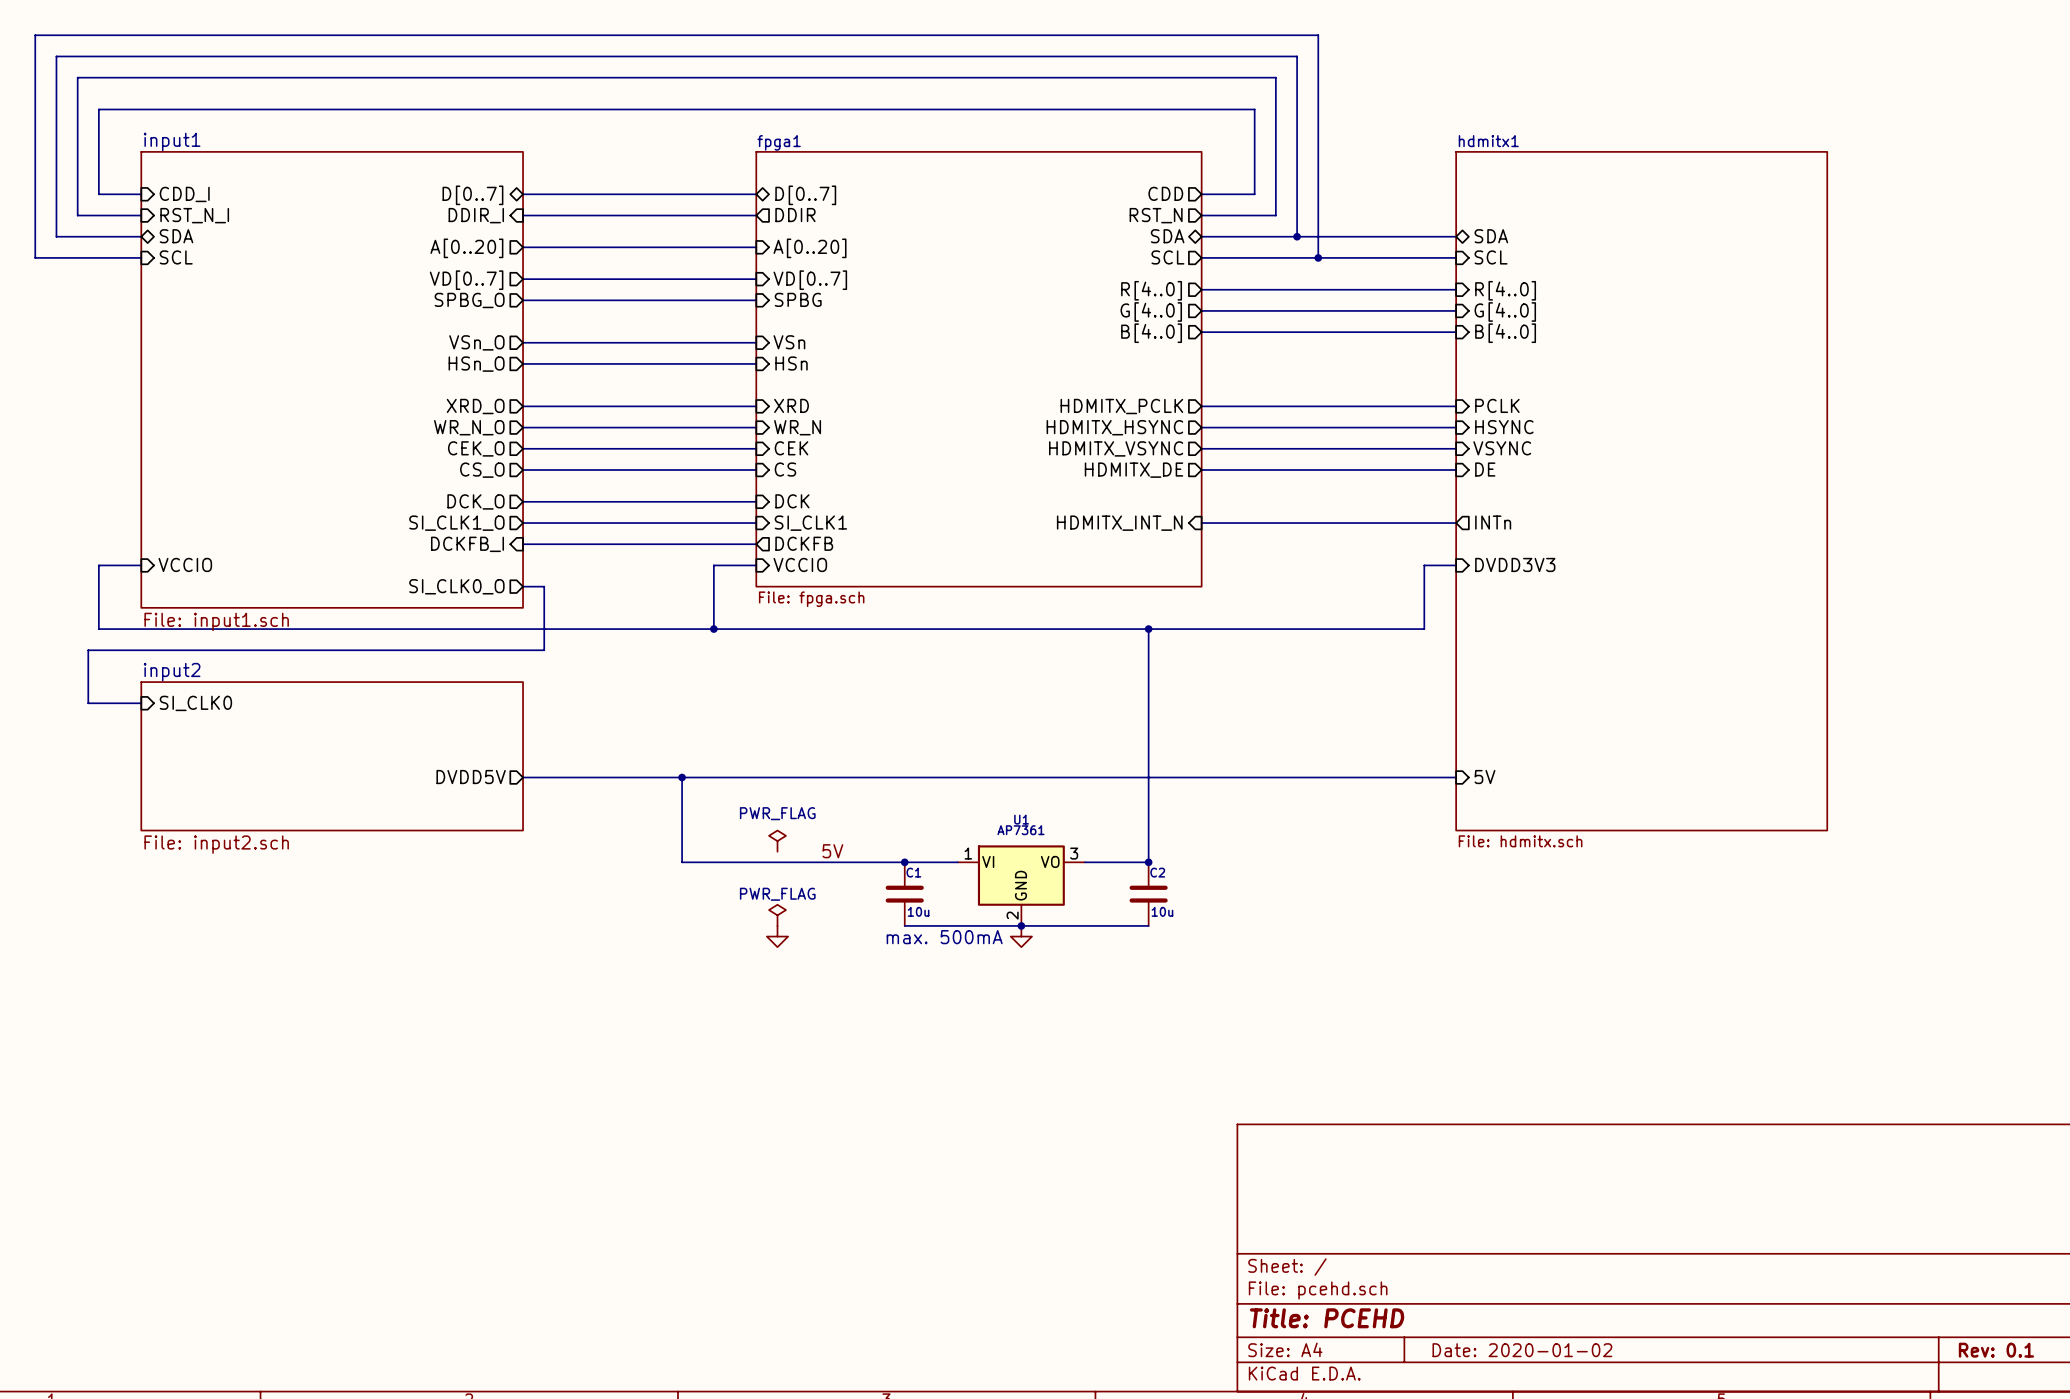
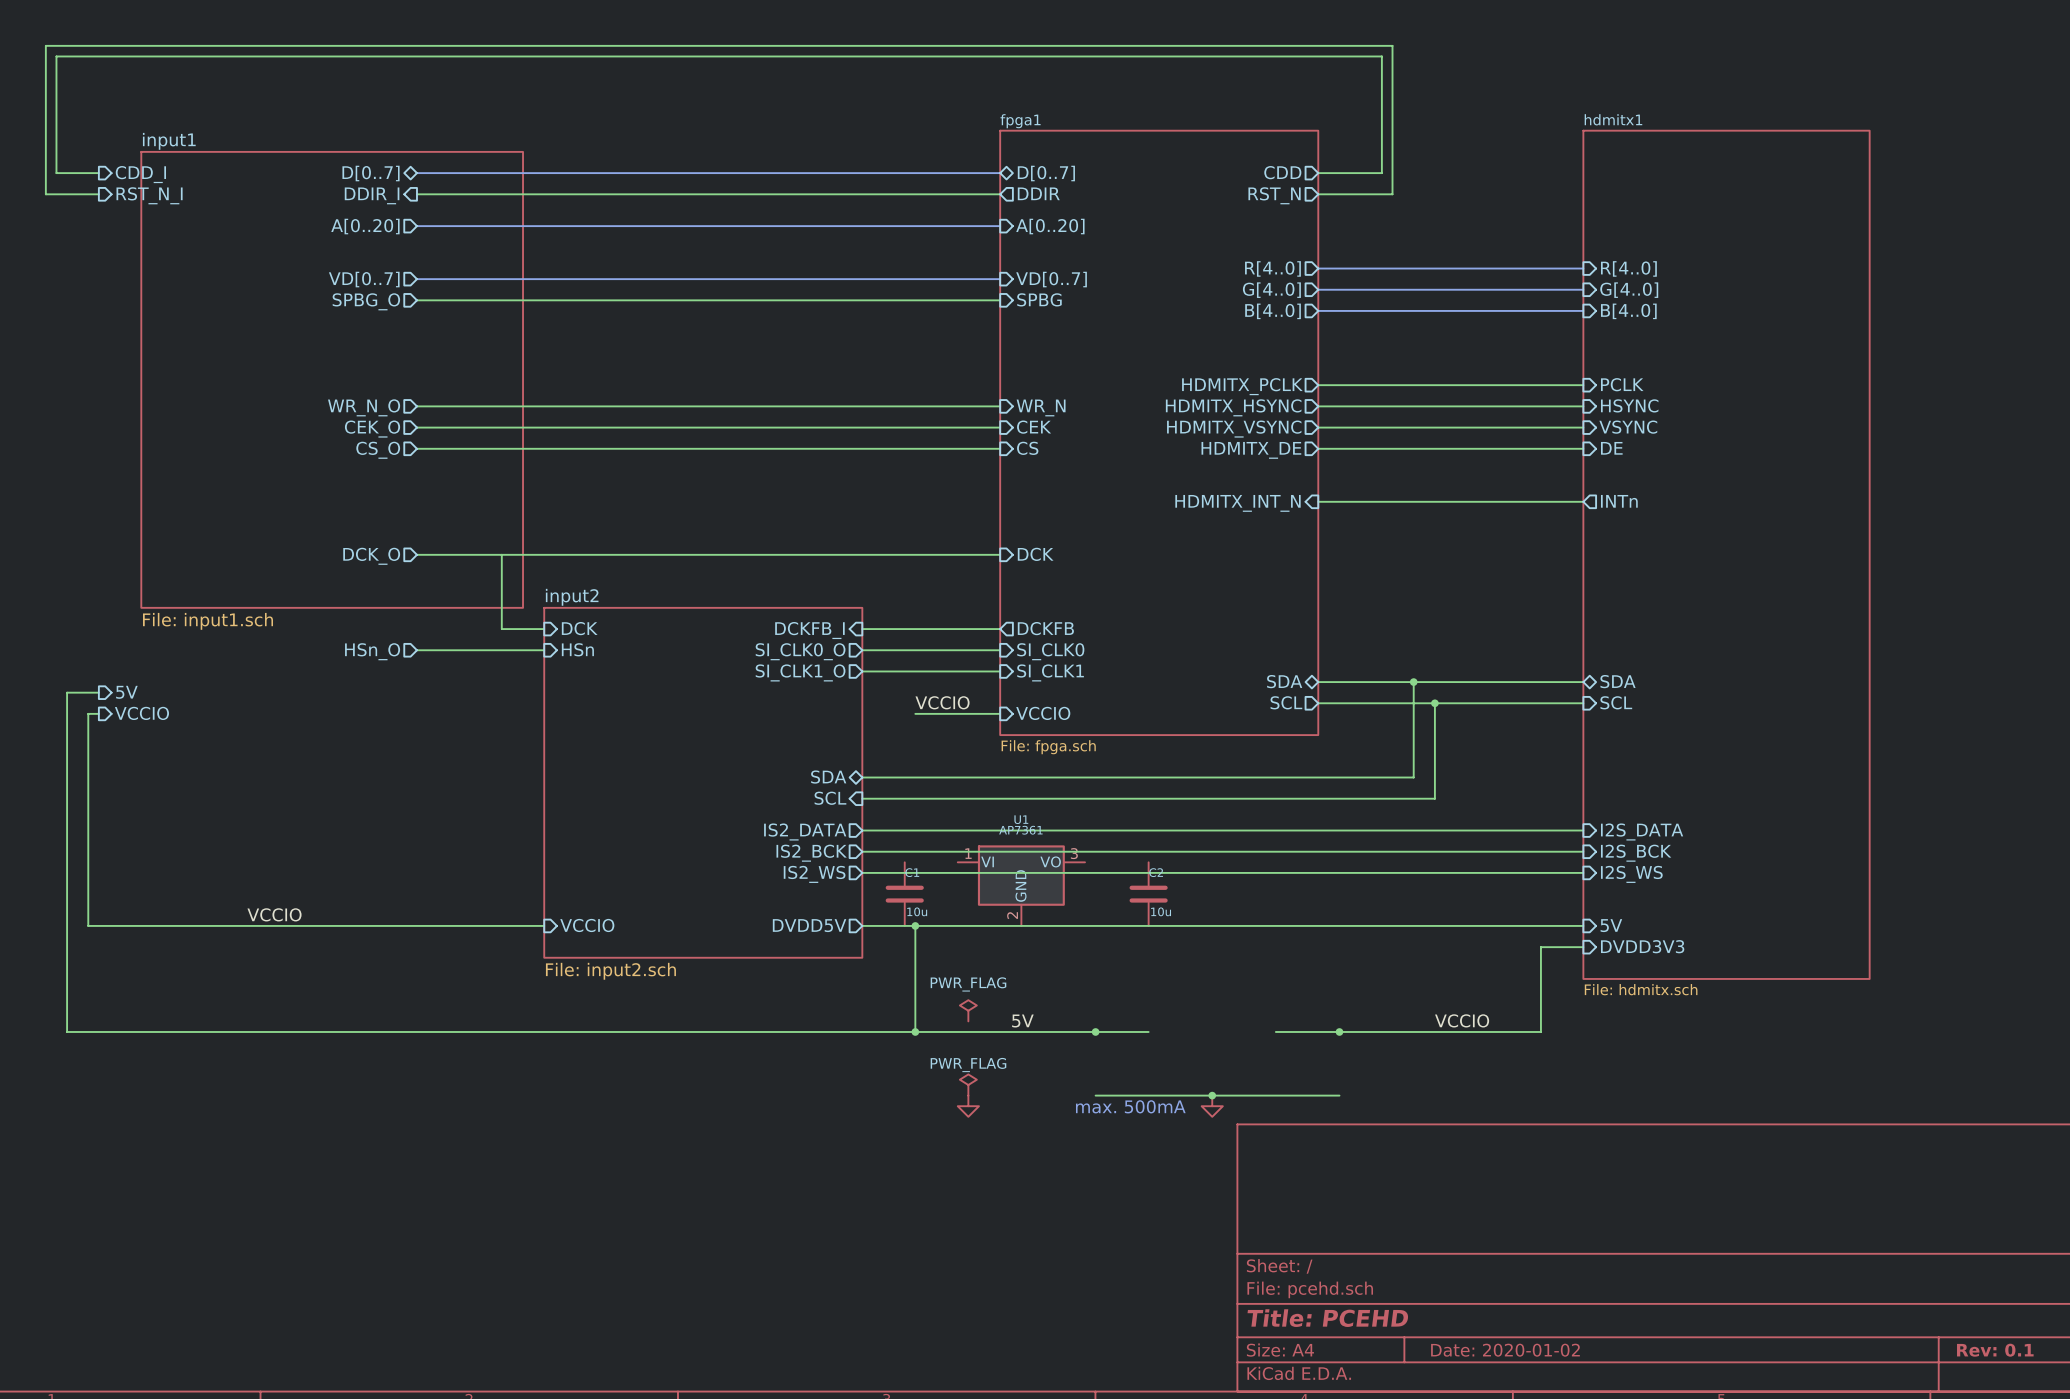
wire: (1297, 56) (1297, 236) -> (1297, 56) (1381, 56) (1381, 173) (1318, 173)
sheet hdmitx1 name position: hdmitx1 (1488, 141) -> hdmitx1 (1613, 119)
sheet fpga1 name position: fpga1 (779, 142) -> fpga1 (1020, 121)
sheet fpga1 shape: [756, 151, 1202, 587] -> [1000, 130, 1319, 736]
sheet hdmitx1 shape: [1456, 151, 1828, 831] -> [1583, 130, 1870, 979]
wire: (56, 173) (56, 236) (141, 236) -> (56, 173) (98, 173)
bus: none -> (416, 173) (1000, 173)
sheet pin: none -> D[0..7] (1046, 173)
sheet pin: none -> DDIR (1038, 193)
sheet pin position: CDD (1165, 193) -> CDD (1282, 172)
wire: none -> (98, 194) (45, 194) (45, 45) (1392, 45) (1392, 194) (1318, 194)
wire: (141, 194) (98, 194) (98, 109) (1254, 109) (1254, 194) (1201, 194) -> none
sheet pin position: CDD_I (184, 194) -> CDD_I (140, 174)
wire: none -> (416, 194) (1000, 194)
bus: (523, 194) (756, 194) -> none
sheet pin position: D[0..7] (472, 195) -> D[0..7] (371, 173)
sheet pin: D[0..7] (805, 195) -> none
wire: (141, 215) (77, 215) (77, 77) (1275, 77) (1275, 215) (1201, 215) -> none
sheet pin position: RST_N_I (194, 215) -> RST_N_I (149, 195)
sheet pin position: DDIR_I (476, 215) -> DDIR_I (372, 195)
wire: (523, 215) (756, 215) -> none
sheet pin: DDIR (795, 215) -> none
sheet pin position: RST_N (1156, 215) -> RST_N (1274, 195)
bus: none -> (416, 226) (1000, 226)
sheet pin: none -> A[0..20] (1050, 226)
sheet pin: SDA (176, 236) -> none
sheet pin: SDA (1167, 236) -> none
wire: (1201, 236) (1456, 236) -> none
junction: (1297, 236) -> none
sheet pin: SDA (1491, 236) -> none
bus: (523, 247) (756, 247) -> none
sheet pin position: A[0..20] (466, 248) -> A[0..20] (365, 226)
sheet pin: A[0..20] (810, 248) -> none
wire: (141, 257) (35, 257) (35, 35) (1318, 35) (1318, 257) -> none
sheet pin: SCL (176, 257) -> none
sheet pin: SCL (1167, 257) -> none
wire: (1201, 257) (1456, 257) -> none
junction: (1318, 257) -> none
sheet pin: SCL (1491, 257) -> none
bus: none -> (1318, 268) (1583, 268)
sheet pin: none -> R[4..0] (1272, 268)
sheet pin: none -> R[4..0] (1628, 268)
bus: none -> (416, 279) (523, 279)
bus: none -> (756, 279) (1000, 279)
sheet pin position: VD[0..7] (466, 280) -> VD[0..7] (364, 279)
sheet pin: VD[0..7] (810, 280) -> none
sheet pin: none -> VD[0..7] (1051, 279)
bus: (1201, 289) (1318, 289) -> none
bus: none -> (1456, 289) (1583, 289)
sheet pin: R[4..0] (1151, 290) -> none
sheet pin: none -> G[4..0] (1271, 290)
sheet pin: R[4..0] (1505, 290) -> none
sheet pin: none -> G[4..0] (1629, 290)
sheet pin: SPBG (798, 299) -> none
sheet pin: none -> SPBG (1039, 299)
wire: none -> (416, 300) (523, 300)
sheet pin position: SPBG_O (469, 300) -> SPBG_O (366, 301)
wire: none -> (756, 300) (1000, 300)
bus: (1201, 310) (1318, 310) -> none
bus: none -> (1456, 310) (1583, 310)
sheet pin: G[4..0] (1151, 311) -> none
sheet pin: none -> B[4..0] (1273, 311)
sheet pin: G[4..0] (1505, 311) -> none
sheet pin: none -> B[4..0] (1628, 311)
bus: (1201, 332) (1456, 332) -> none
sheet pin: B[4..0] (1151, 333) -> none
sheet pin: B[4..0] (1505, 333) -> none
sheet pin: VSn_O (476, 342) -> none
wire: (523, 342) (756, 342) -> none
sheet pin: VSn (789, 342) -> none
wire: (523, 363) (756, 363) -> none
sheet pin: HSn (791, 363) -> none
sheet pin: HSn_O (476, 364) -> none
wire: none -> (1318, 385) (1583, 385)
sheet pin: XRD (791, 405) -> none
sheet pin position: PCLK (1497, 405) -> PCLK (1622, 384)
wire: none -> (416, 406) (523, 406)
sheet pin: XRD_O (475, 406) -> none
wire: none -> (756, 406) (1000, 406)
sheet pin: none -> WR_N (1041, 407)
sheet pin position: HDMITX_PCLK (1121, 406) -> HDMITX_PCLK (1242, 386)
wire: (1201, 406) (1318, 406) -> none
wire: none -> (1456, 406) (1583, 406)
wire: none -> (416, 427) (523, 427)
sheet pin position: WR_N_O (469, 427) -> WR_N_O (364, 407)
wire: none -> (756, 427) (1000, 427)
sheet pin: WR_N (797, 427) -> none
sheet pin: none -> CEK (1034, 427)
sheet pin position: HDMITX_HSYNC (1114, 427) -> HDMITX_HSYNC (1233, 407)
wire: (1201, 427) (1318, 427) -> none
wire: none -> (1456, 427) (1583, 427)
sheet pin position: HSYNC (1504, 427) -> HSYNC (1629, 405)
wire: none -> (416, 448) (523, 448)
sheet pin position: CEK_O (476, 448) -> CEK_O (372, 429)
wire: none -> (756, 448) (1000, 448)
sheet pin: CEK (791, 448) -> none
sheet pin: none -> CS (1027, 448)
sheet pin position: HDMITX_VSYNC (1116, 448) -> HDMITX_VSYNC (1234, 429)
wire: (1201, 448) (1318, 448) -> none
wire: none -> (1456, 448) (1583, 448)
sheet pin position: VSYNC (1502, 448) -> VSYNC (1628, 427)
sheet pin: CS (785, 469) -> none
sheet pin position: DE (1485, 469) -> DE (1611, 448)
sheet pin position: CS_O (482, 470) -> CS_O (378, 450)
wire: (523, 470) (756, 470) -> none
sheet pin position: HDMITX_DE (1134, 470) -> HDMITX_DE (1251, 450)
wire: (1201, 470) (1456, 470) -> none
sheet pin position: DCK_O (475, 501) -> DCK_O (371, 556)
wire: (523, 501) (756, 501) -> none
sheet pin: DCK (792, 501) -> none
wire: none -> (1318, 501) (1583, 501)
sheet pin position: INTn (1493, 522) -> INTn (1619, 501)
sheet pin: SI_CLK1_O (456, 523) -> none
wire: (523, 523) (756, 523) -> none
sheet pin: SI_CLK1 (810, 523) -> none
sheet pin position: HDMITX_INT_N (1119, 523) -> HDMITX_INT_N (1237, 503)
wire: (1201, 523) (1456, 523) -> none
sheet pin: DCKFB (804, 543) -> none
sheet pin: DCKFB_I (467, 544) -> none
wire: (523, 544) (756, 544) -> none
wire: none -> (416, 554) (1000, 554)
sheet pin: none -> DCK (1035, 554)
sheet pin position: VCCIO (185, 564) -> VCCIO (141, 713)
sheet pin: VCCIO (800, 564) -> none
sheet pin: DVDD3V3 (1515, 564) -> none
wire: (141, 565) (98, 565) (98, 629) (501, 629) -> (501, 554) (501, 629)
wire: (756, 565) (713, 565) (713, 629) -> none
wire: (1456, 565) (1424, 565) (1424, 629) (1000, 629) -> none
sheet pin: SI_CLK0_O (456, 586) -> none
wire: (523, 586) (544, 586) (544, 650) -> none
sheet fpga1 value position: File: fpga.sch (811, 599) -> File: fpga.sch (1048, 747)
sheet pin: none -> DCK (579, 628)
sheet pin: none -> DCKFB (1045, 628)
wire: (544, 629) (862, 629) -> none
junction: (713, 629) -> none
sheet pin: none -> DCKFB_I (809, 630)
wire: (1148, 629) (1148, 862) (1085, 862) -> none
junction: (1148, 629) -> none
sheet pin: none -> HSn (577, 649)
sheet pin: none -> HSn_O (372, 651)
wire: (416, 650) (88, 650) (88, 703) (141, 703) -> none
sheet pin: none -> SI_CLK0_O (800, 651)
wire: none -> (862, 650) (1000, 650)
sheet pin: none -> SI_CLK0 (1050, 651)
sheet pin: none -> SI_CLK1_O (800, 672)
wire: none -> (862, 671) (1000, 671)
sheet pin: none -> SI_CLK1 (1050, 672)
sheet input2 name position: input2 (172, 672) -> input2 (572, 597)
sheet pin: none -> SDA (1284, 681)
sheet pin: none -> SDA (1618, 681)
sheet input2 shape: [141, 682, 524, 831] -> [544, 607, 863, 958]
wire: none -> (1318, 682) (1583, 682)
junction: none -> (1413, 682)
wire: none -> (98, 692) (67, 692) (67, 1031) (1148, 1031)
sheet pin: none -> 5V (126, 692)
label: none -> VCCIO (942, 702)
sheet pin: none -> SCL (1286, 702)
sheet pin: none -> SCL (1616, 702)
sheet pin: SI_CLK0 (195, 703) -> none
wire: none -> (1318, 703) (1583, 703)
wire: none -> (1434, 703) (1434, 798) (862, 798)
junction: none -> (1434, 703)
wire: none -> (98, 713) (88, 713) (88, 925) (544, 925)
wire: none -> (915, 713) (1000, 713)
sheet pin: none -> VCCIO (1043, 713)
sheet pin: DVDD5V (471, 777) -> none
wire: (523, 777) (862, 777) -> none
wire: (682, 777) (682, 862) (957, 862) -> none
junction: (682, 777) -> none
sheet pin: none -> SDA (828, 777)
wire: (1413, 777) (1456, 777) -> (1413, 777) (1413, 682)
sheet pin position: 5V (1484, 777) -> 5V (1611, 925)
sheet pin: none -> SCL (830, 798)
sheet pin: none -> IS2_DATA (805, 831)
wire: none -> (862, 830) (1583, 830)
sheet pin: none -> I2S_DATA (1642, 831)
power symbol: PWR_FLAG (777, 841) -> none
sheet hdmitx1 value position: File: hdmitx.sch (1520, 841) -> File: hdmitx.sch (1641, 989)
sheet input2 value position: File: input2.sch (216, 844) -> File: input2.sch (610, 971)
sheet pin: none -> IS2_BCK (811, 853)
label: 5V (832, 851) -> none
wire: none -> (862, 851) (1583, 851)
sheet pin: none -> I2S_BCK (1636, 853)
junction: (904, 862) -> none
junction: (1148, 862) -> none
wire: none -> (862, 872) (1583, 872)
sheet pin: none -> IS2_WS (814, 874)
sheet pin: none -> I2S_WS (1631, 874)
label: none -> VCCIO (274, 914)
power symbol: PWR_FLAG (777, 915) -> none
sheet pin: none -> VCCIO (587, 925)
sheet pin: none -> DVDD5V (809, 925)
wire: none -> (862, 925) (904, 925)
wire: none -> (915, 925) (915, 1031)
junction: none -> (915, 925)
junction: (1021, 925) -> none
wire: none -> (1148, 925) (1583, 925)
power symbol: (777, 936) -> none
power symbol: (1021, 936) -> none
text: max. 500mA (944, 937) -> none
sheet pin: none -> DVDD3V3 (1642, 946)
wire: none -> (1583, 947) (1540, 947) (1540, 1031) (1275, 1031)
power symbol: none -> PWR_FLAG (968, 1010)
label: none -> 5V (1022, 1021)
label: none -> VCCIO (1462, 1020)
junction: none -> (915, 1031)
junction: none -> (1095, 1031)
junction: none -> (1339, 1031)
power symbol: none -> PWR_FLAG (968, 1085)
wire: none -> (1095, 1095) (1339, 1095)
junction: none -> (1212, 1095)
power symbol: none -> (968, 1106)
text: none -> max. 500mA (1130, 1106)
power symbol: none -> (1212, 1106)

